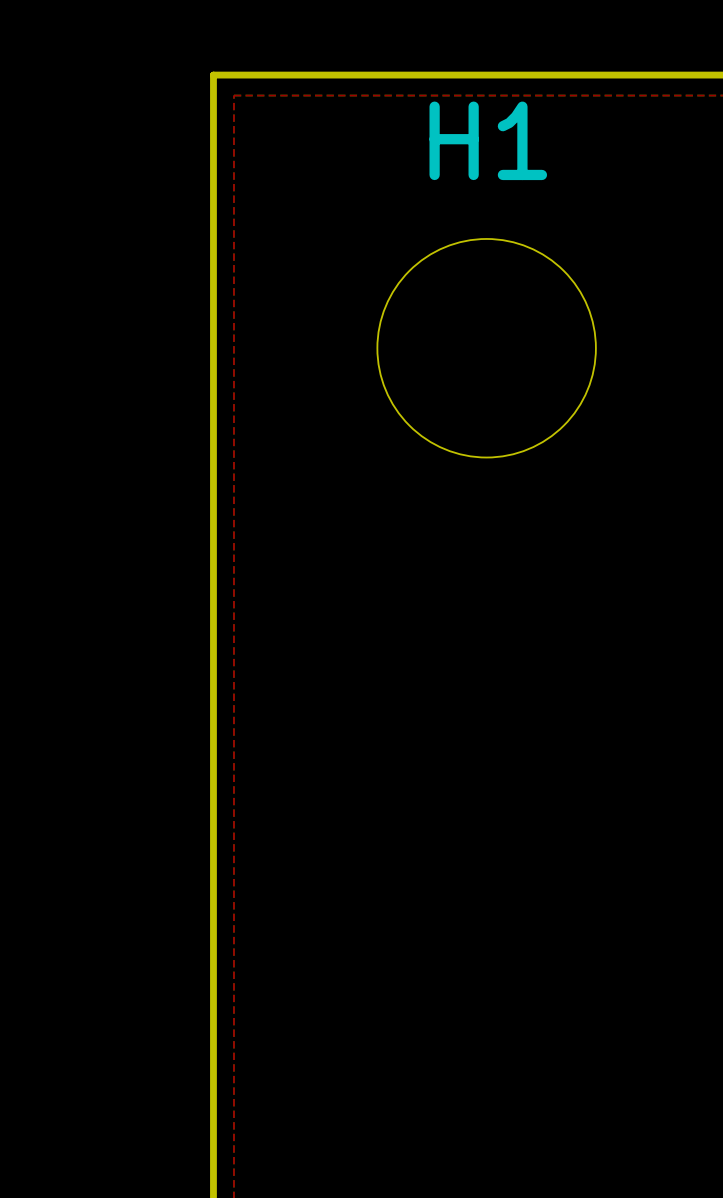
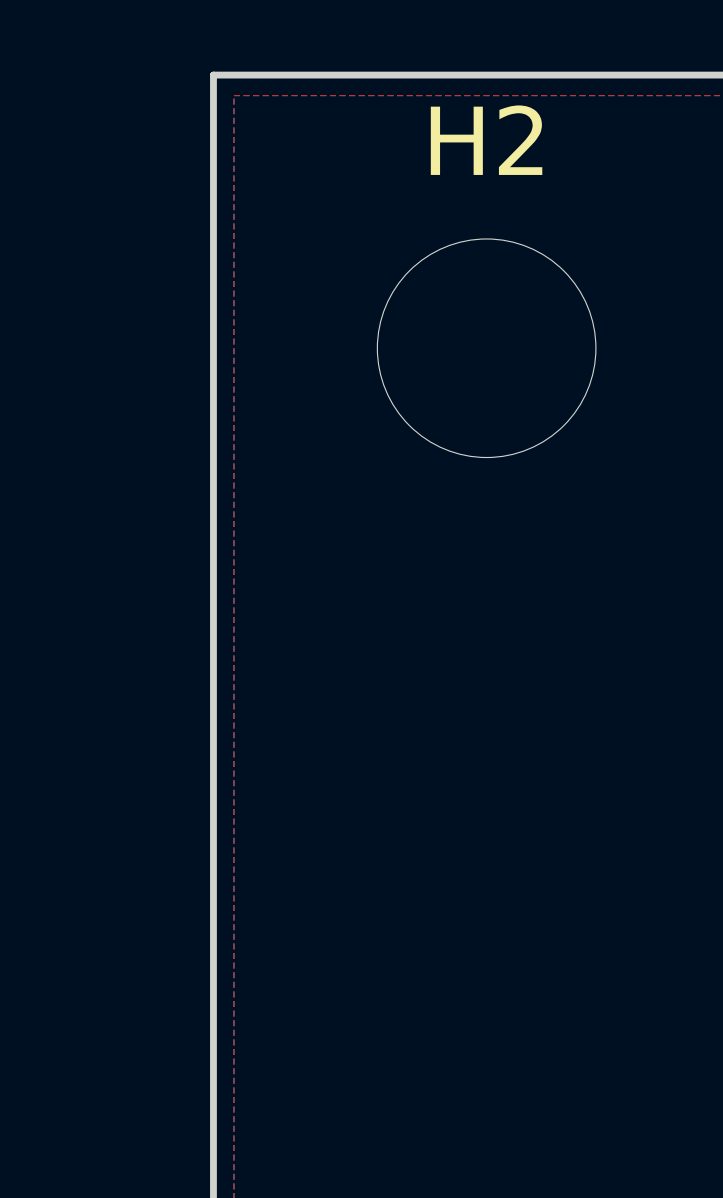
H1 name: H1 (488, 140) -> H2 (486, 140)

